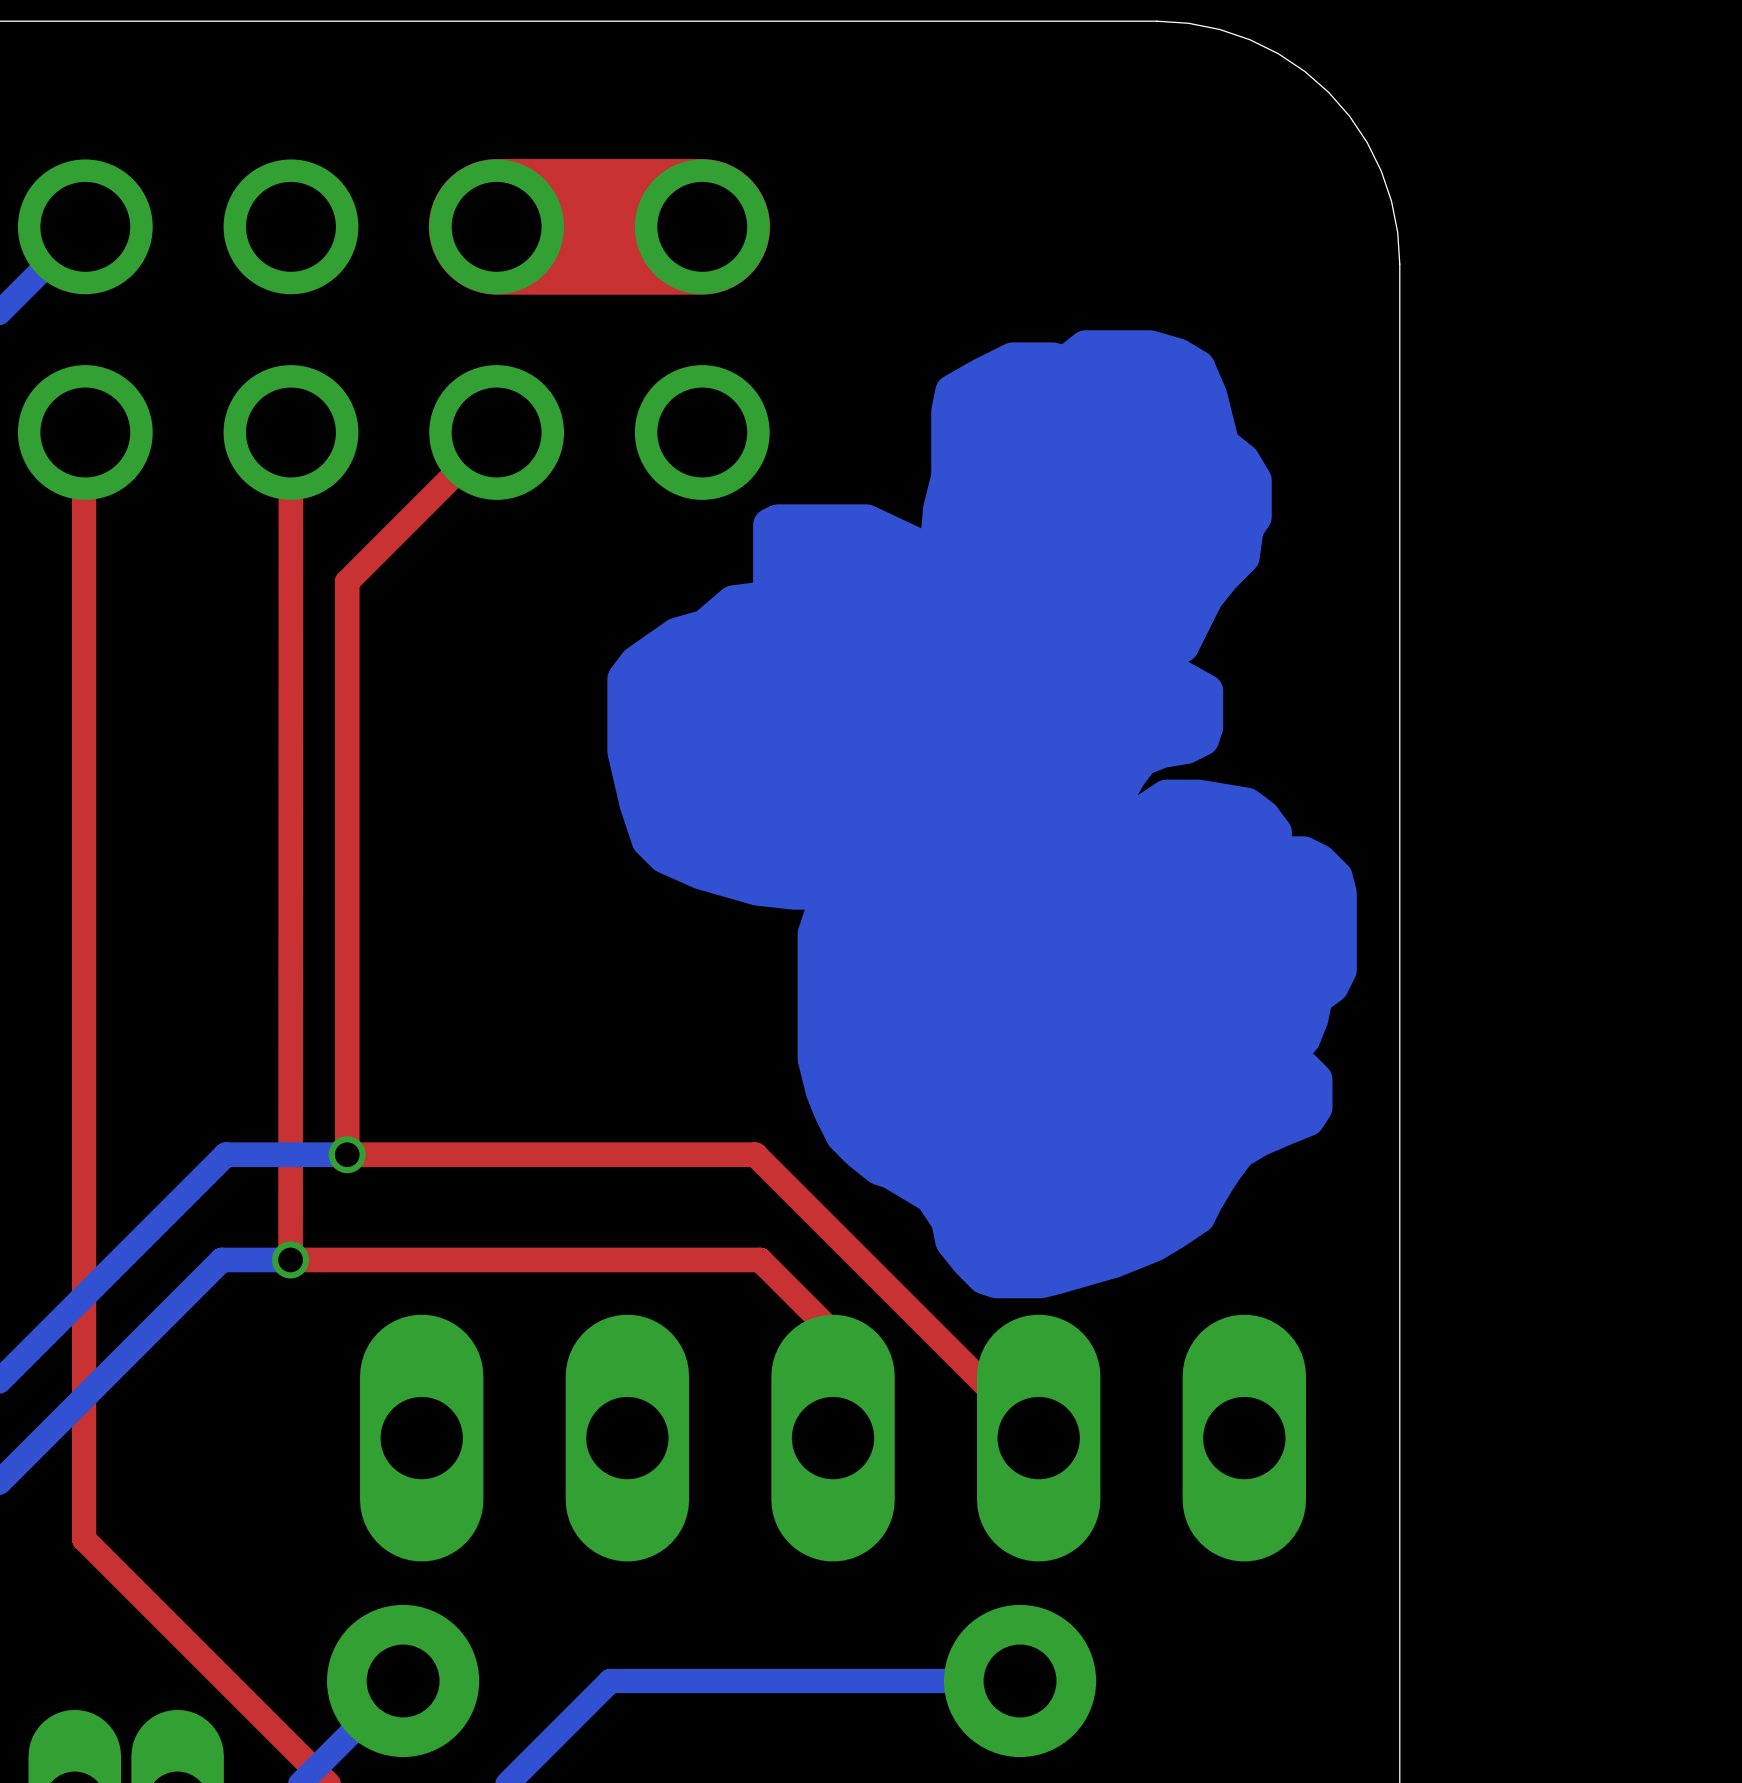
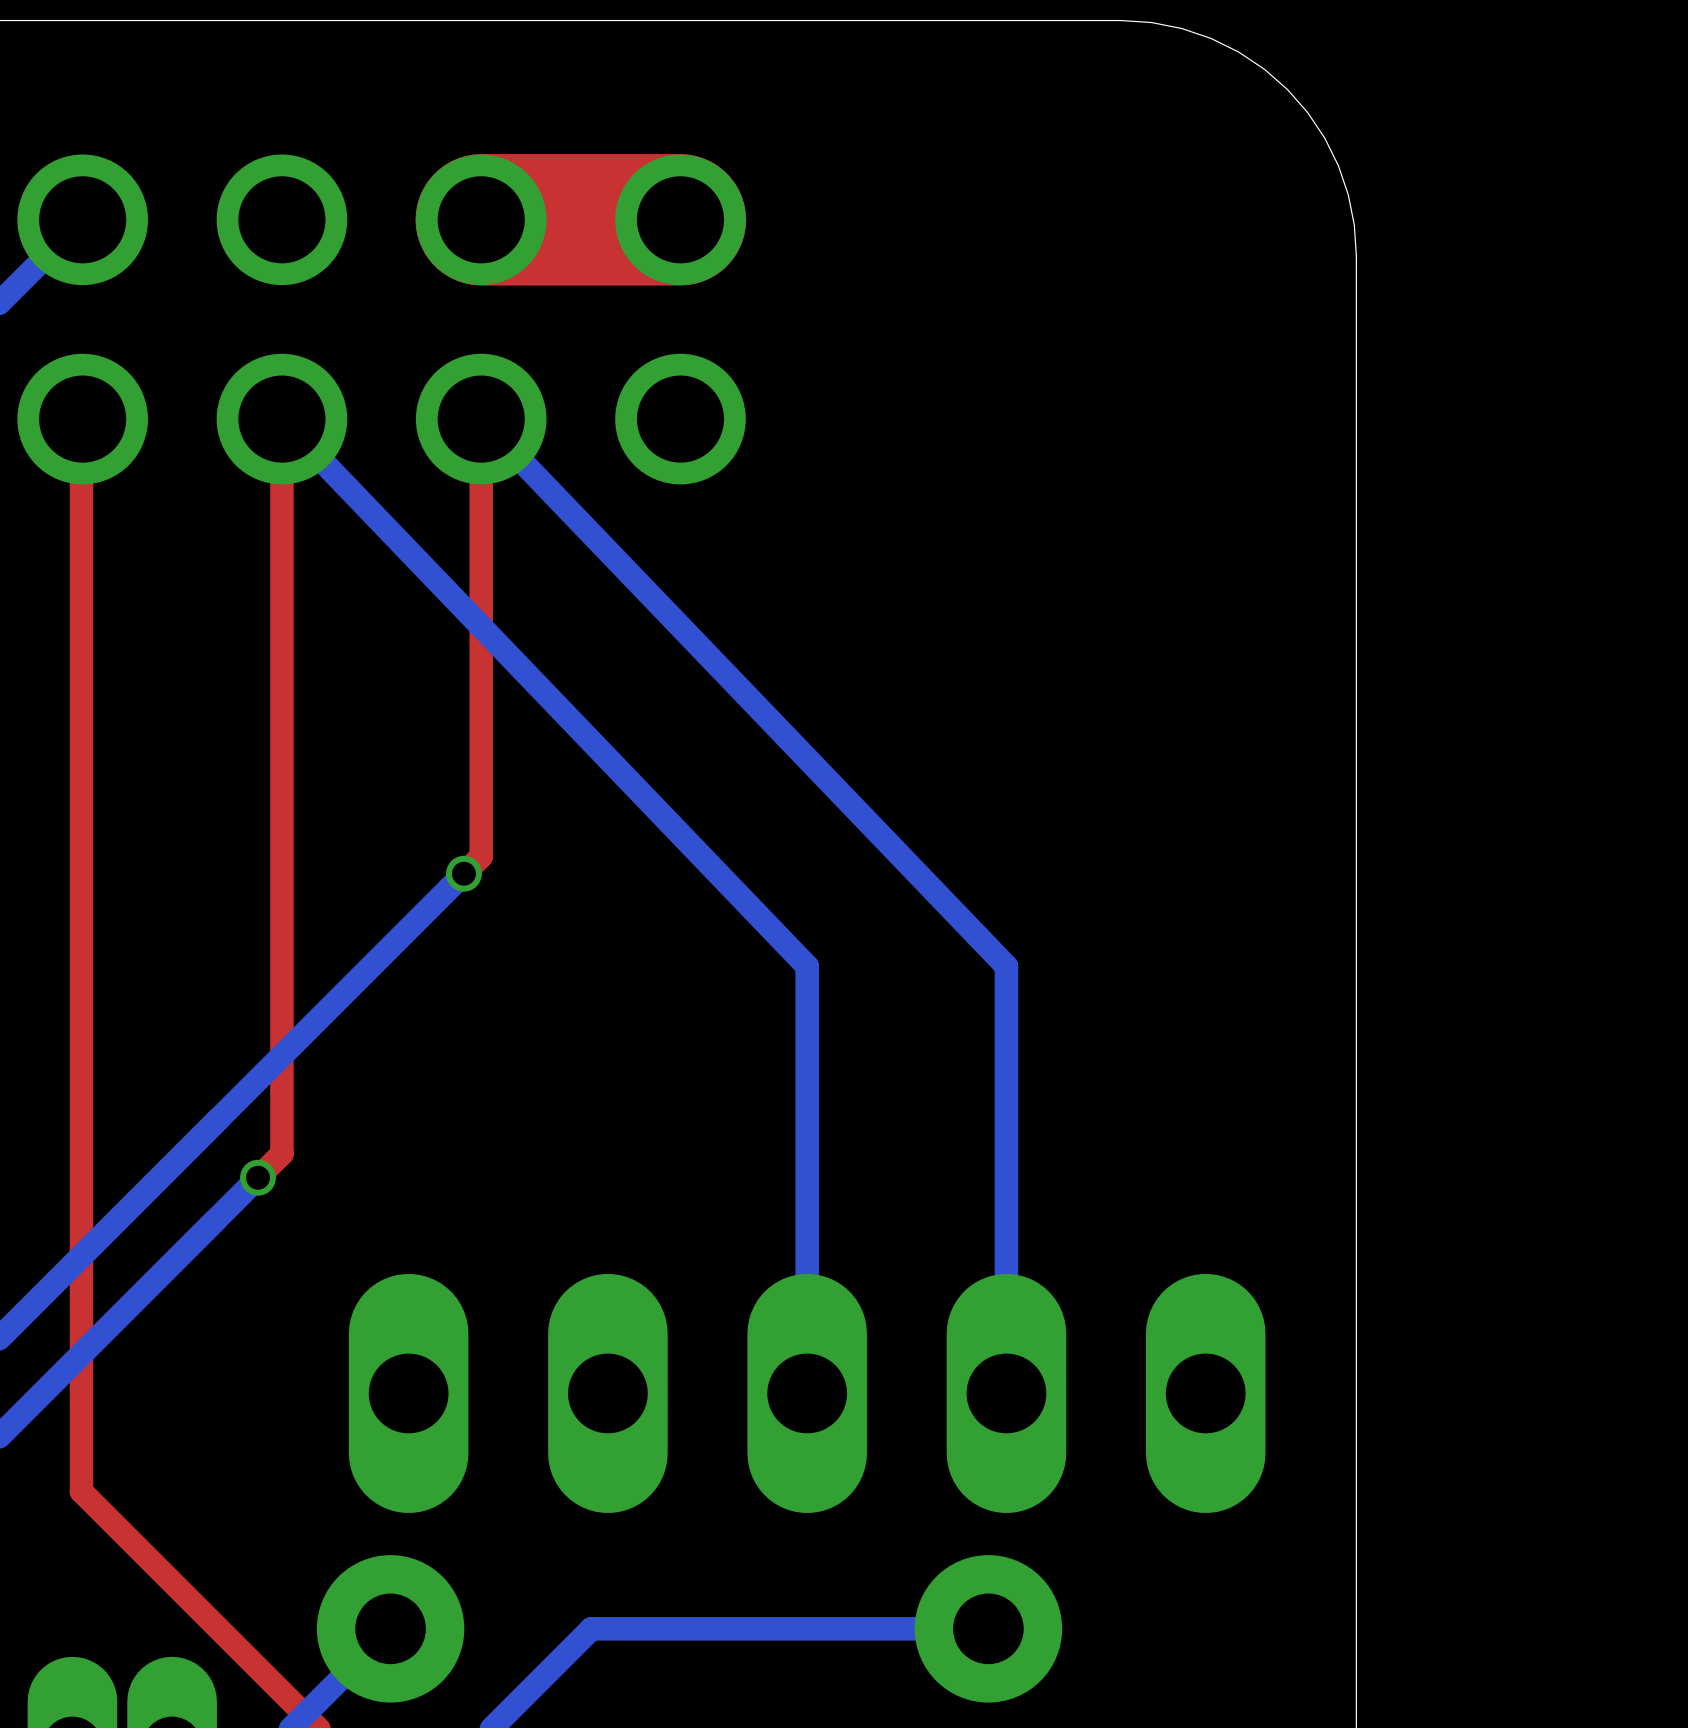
drawing: [607, 330, 1357, 1299] -> none
top track: (290, 432) (290, 1259) (760, 1259) (833, 1332) (833, 1438) -> (281, 419) (281, 1153) (258, 1177)
bottom track: none -> (281, 419) (807, 966) (807, 1393)
top track: (496, 432) (347, 581) (347, 1154) (755, 1154) (1038, 1438) -> (481, 419) (481, 856) (463, 873)
bottom track: none -> (481, 419) (1006, 966) (1006, 1393)
via: none -> (463, 873)
bottom track: (347, 1154) (225, 1154) -> (463, 873) (218, 1118)
via: (347, 1154) -> none
via: none -> (258, 1177)
bottom track: (290, 1259) (221, 1259) -> (258, 1177) (214, 1220)
via: (290, 1259) -> none

